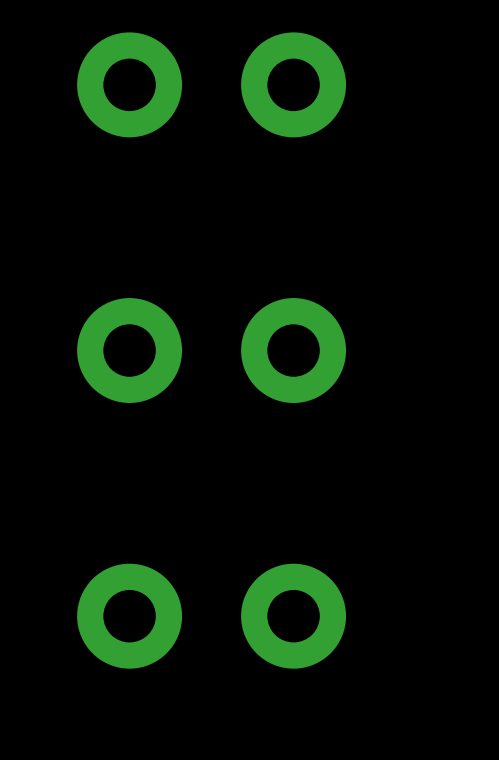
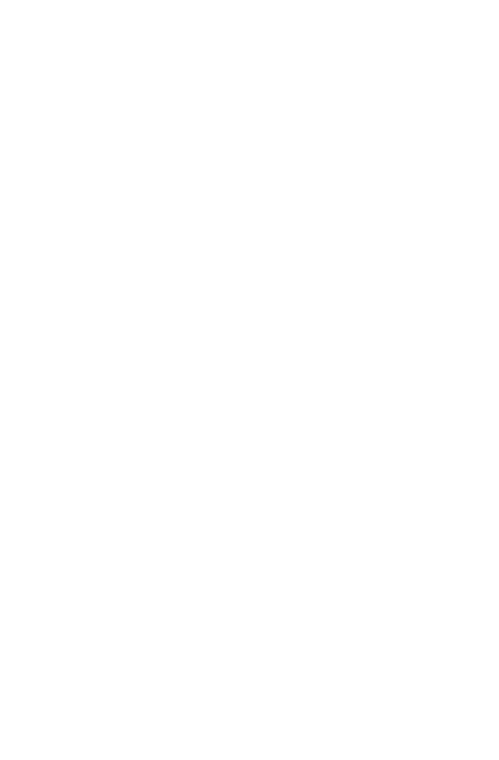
part: (211, 84) -> none
part: (211, 350) -> none
part: (211, 616) -> none

